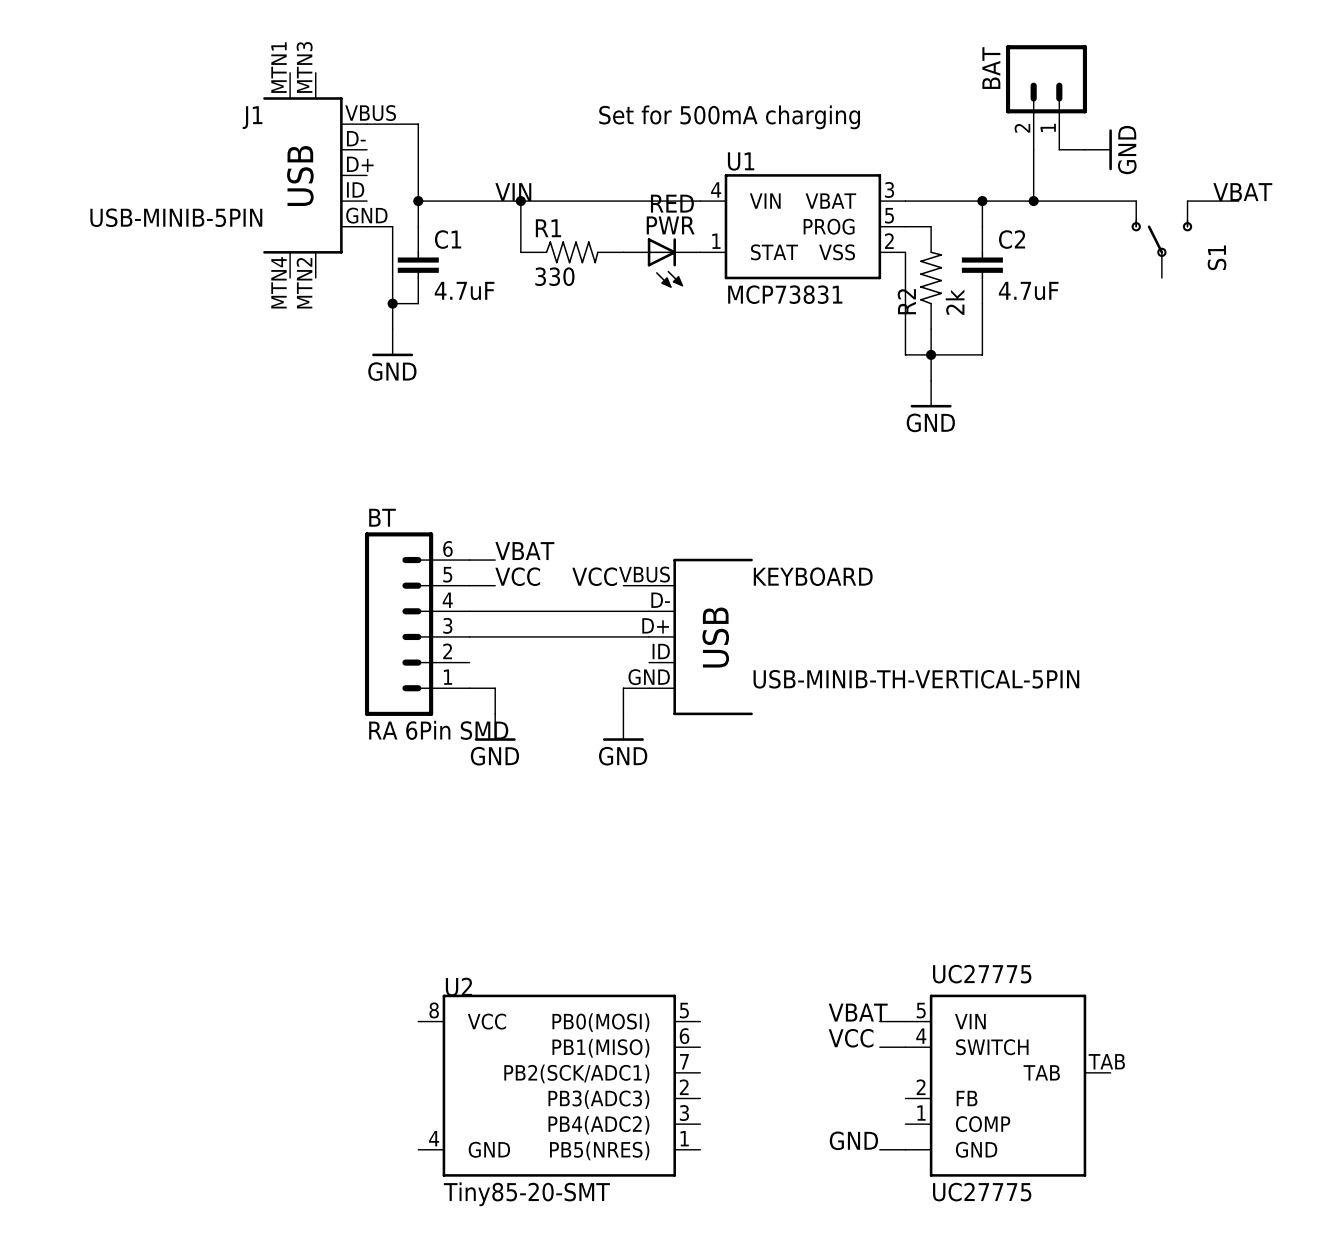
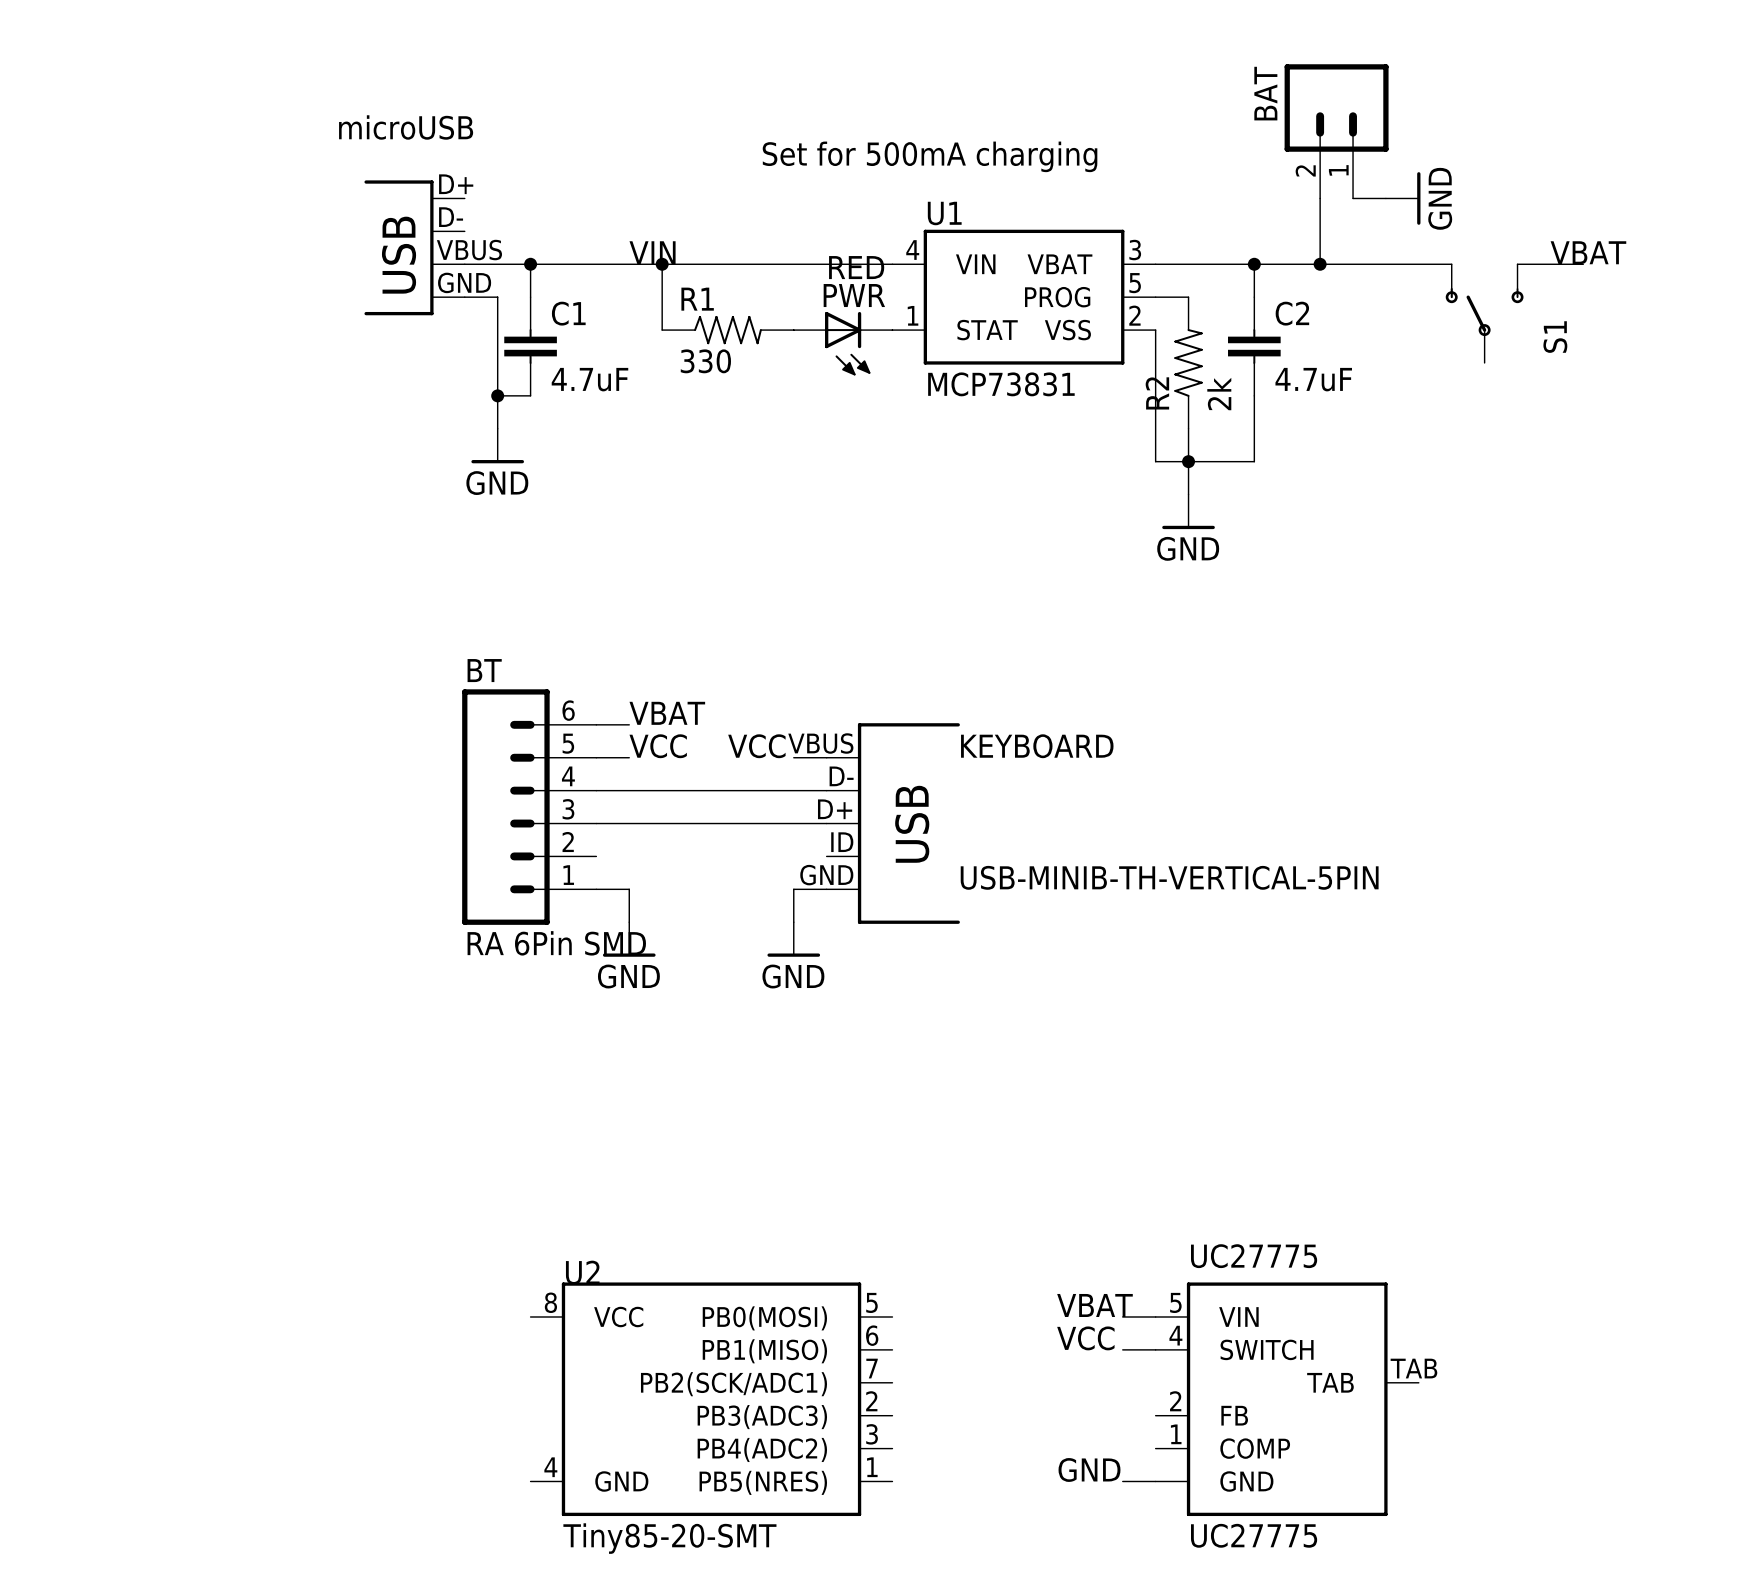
text: none -> microUSB (406, 127)
wire: (367, 124) (418, 124) (418, 201) -> (464, 264) (530, 264)
J1: USB-MINIB-5PIN (315, 175) -> none
part: none -> (414, 247)

